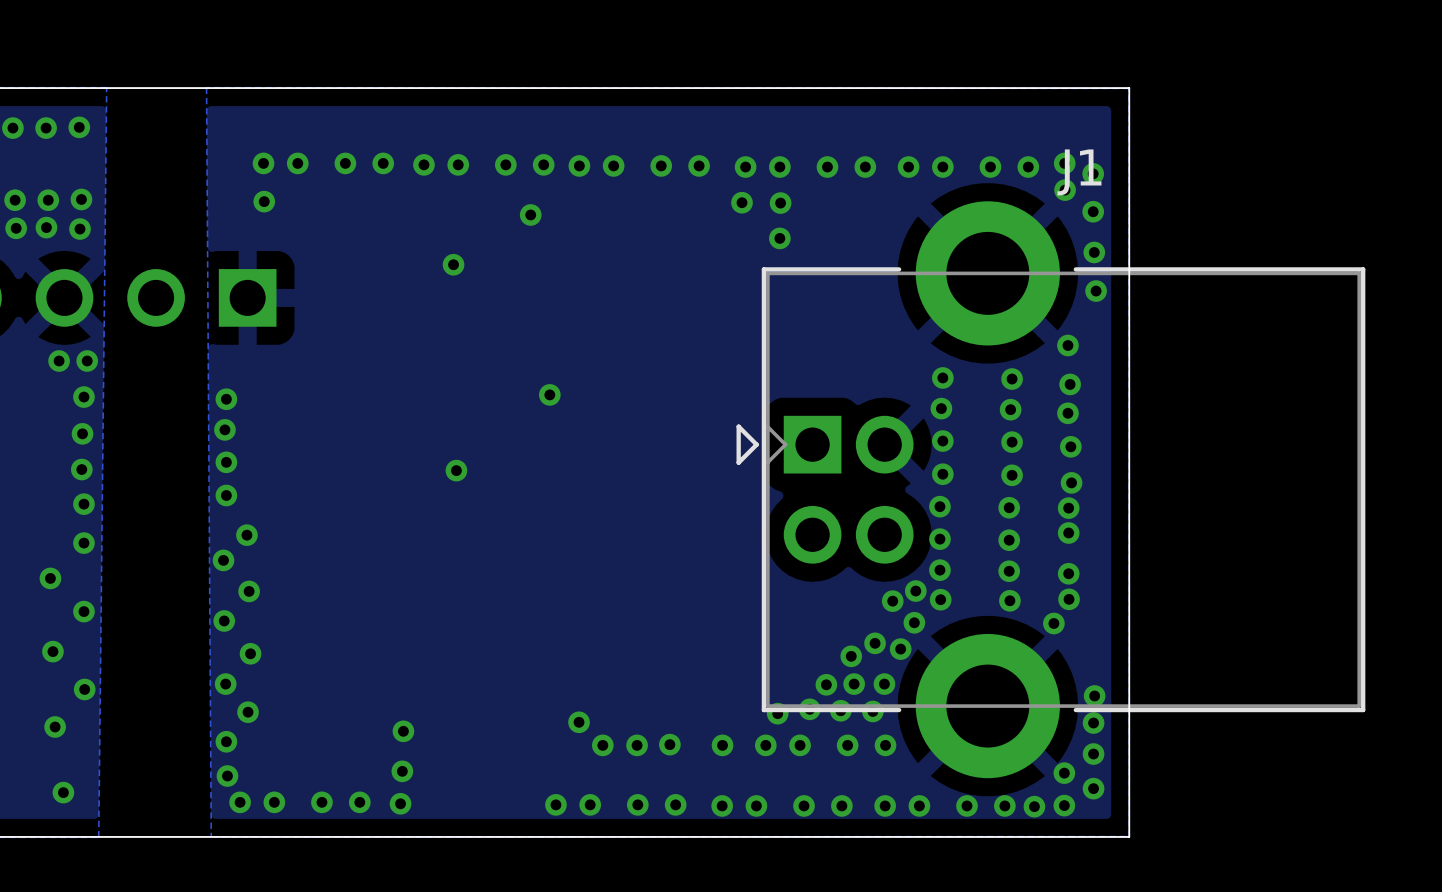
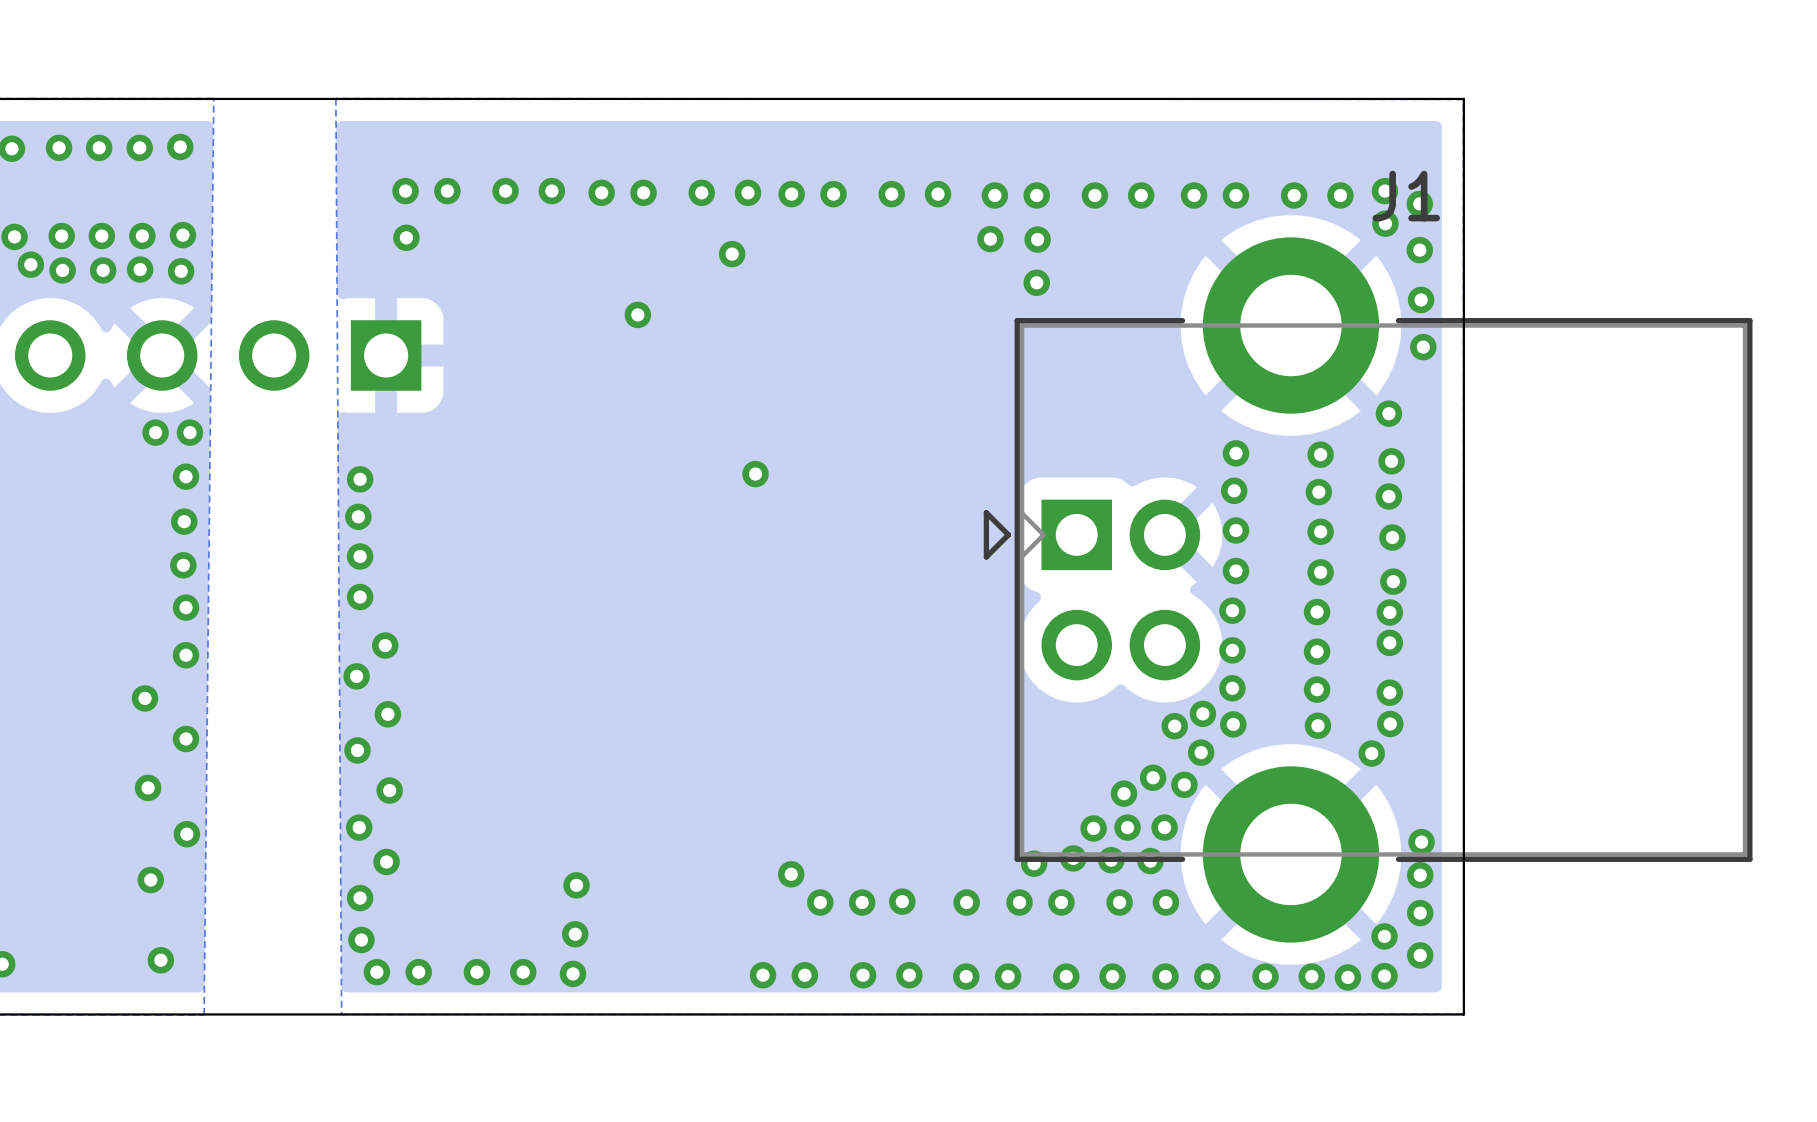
via: (456, 470) -> none

